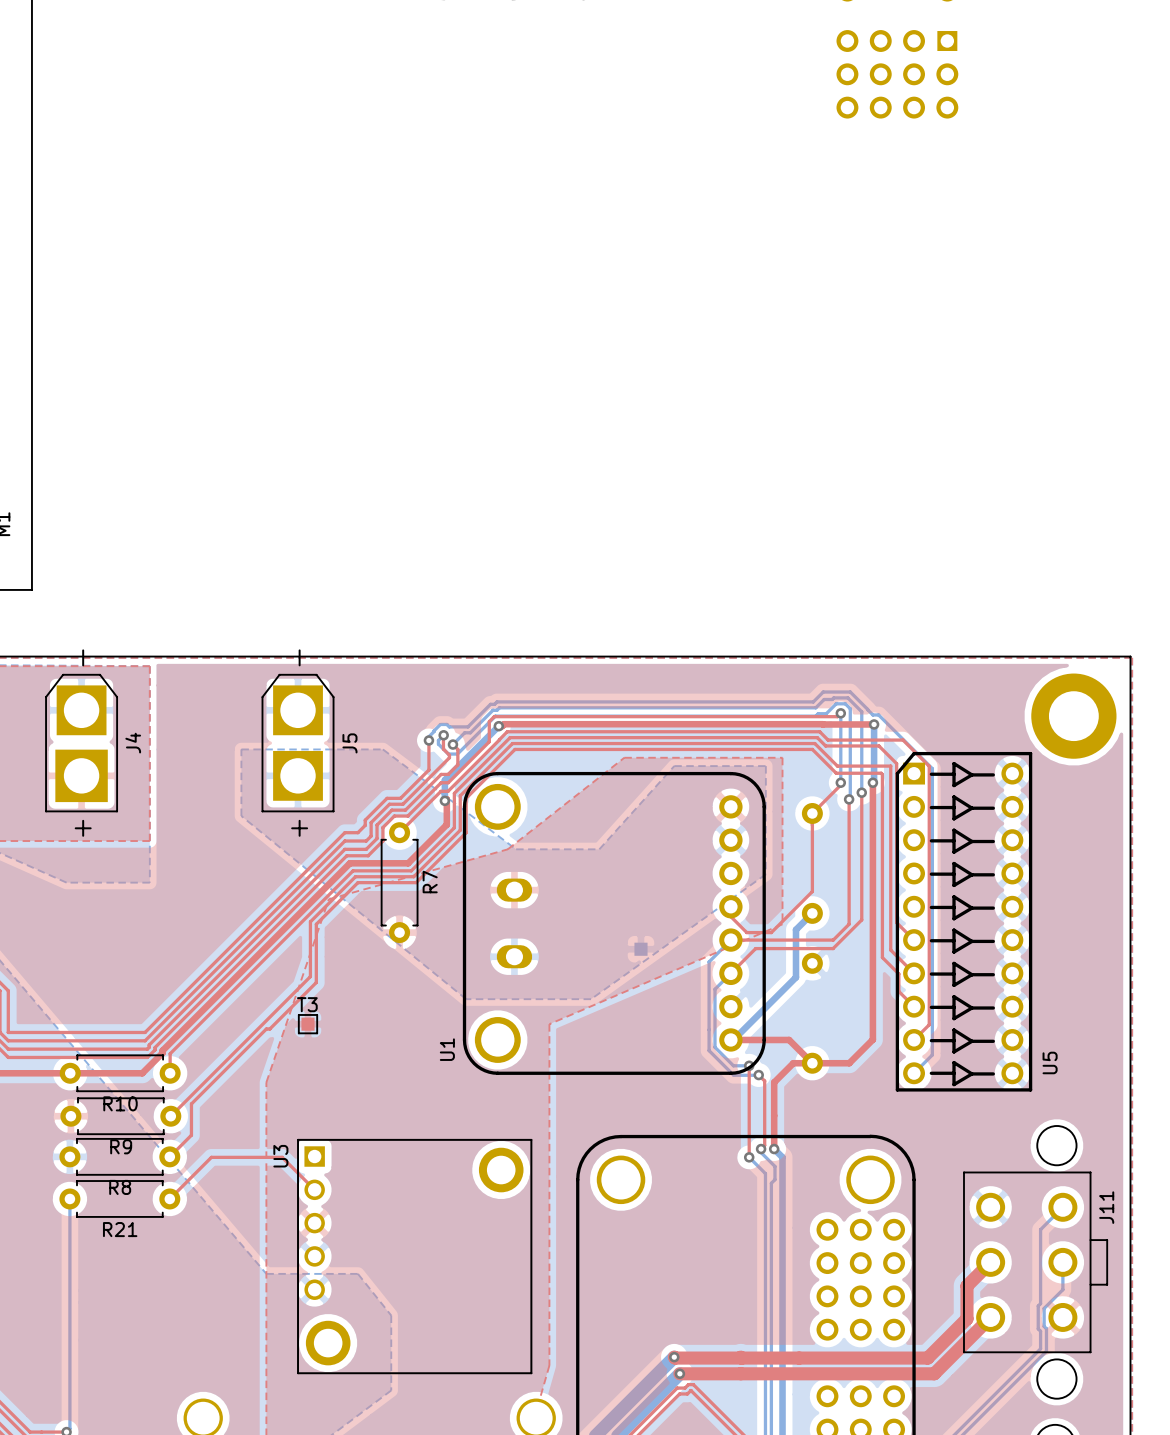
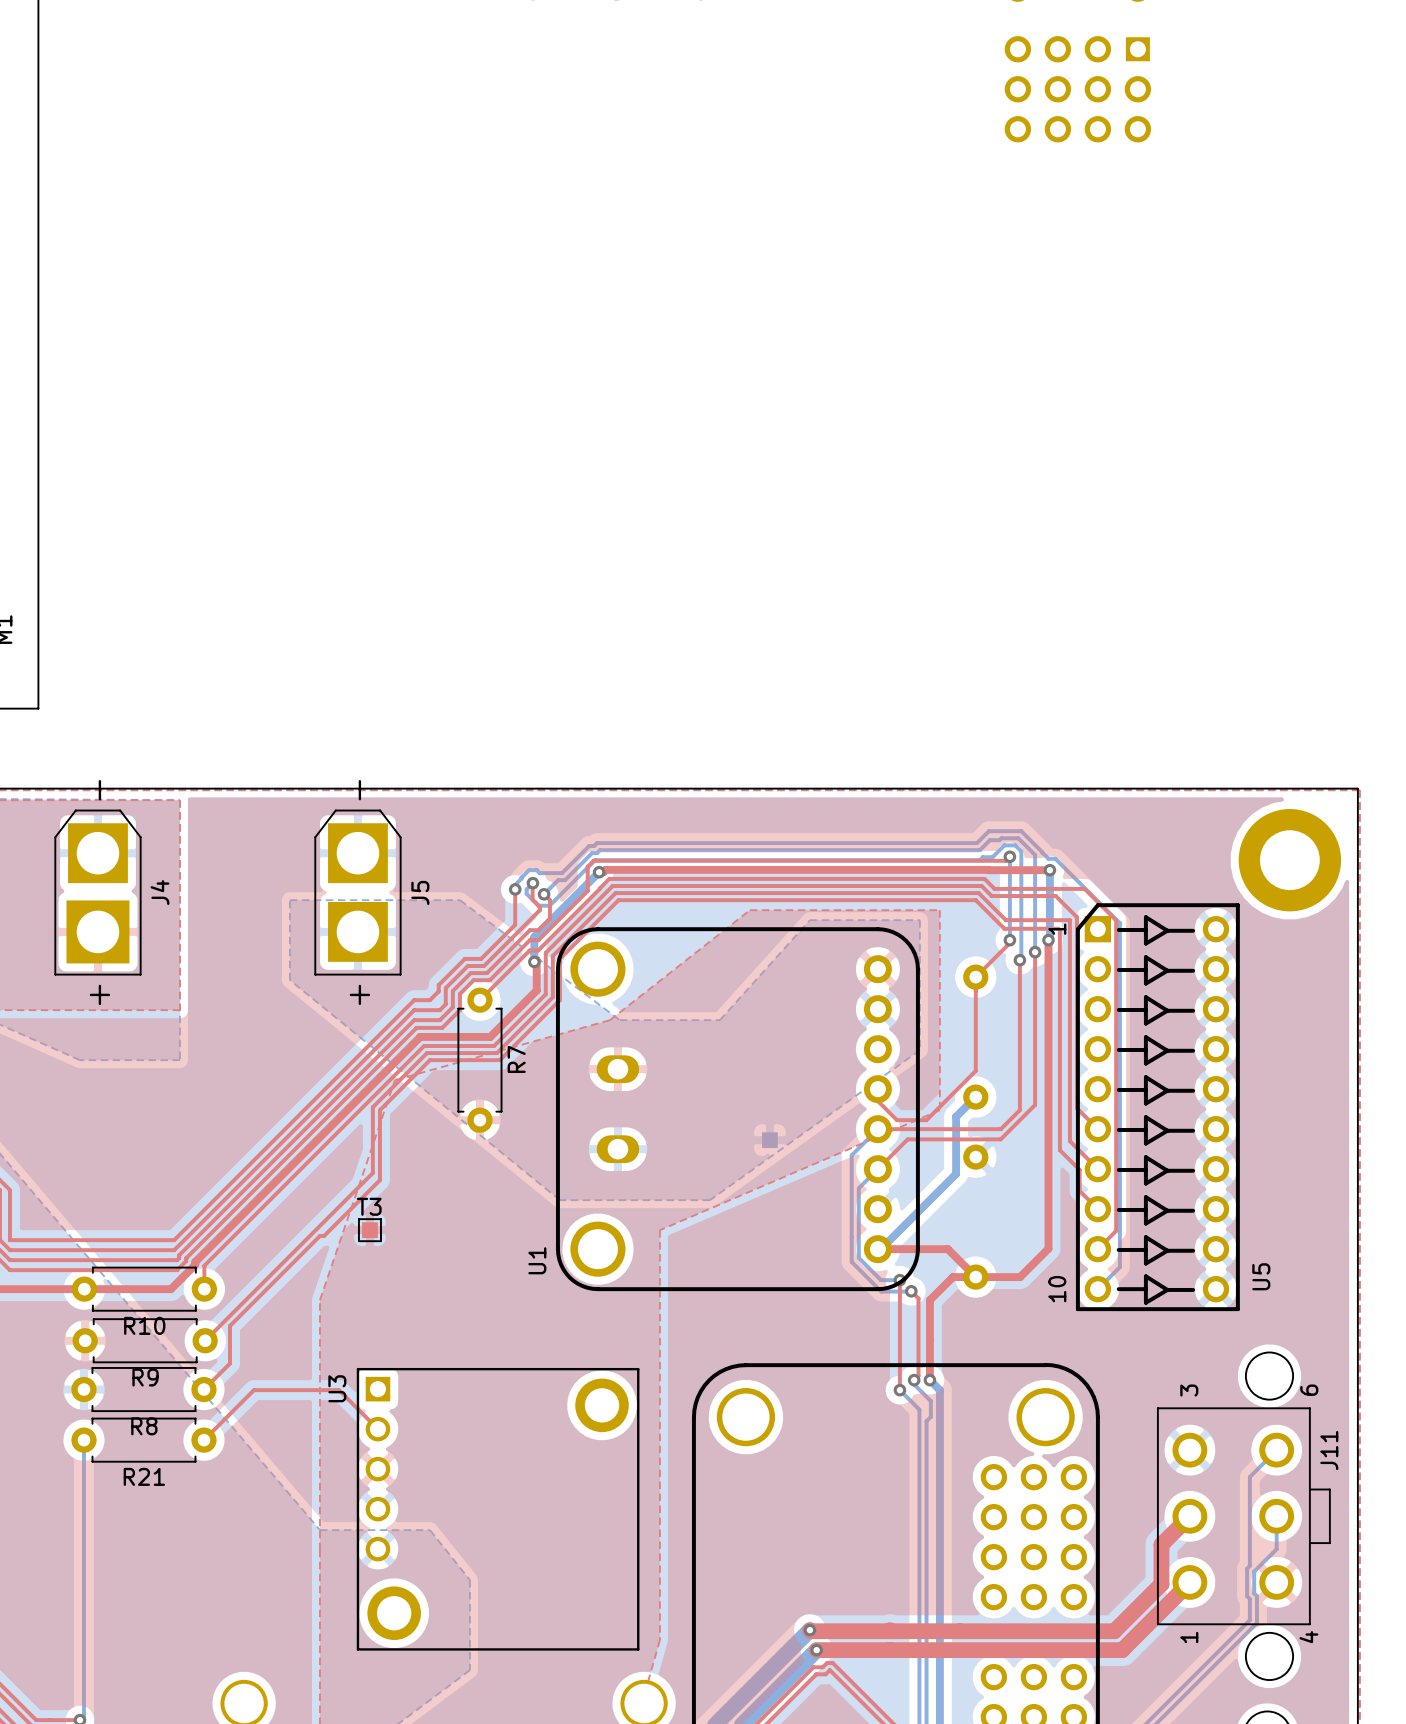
U5 text: none -> 1 (1057, 929)
U5 text: none -> 10 (1057, 1289)
J11 text: none -> 3 (1189, 1390)
J11 text: none -> 6 (1309, 1390)
J11 text: none -> 1 (1189, 1637)
J11 text: none -> 4 (1308, 1637)

